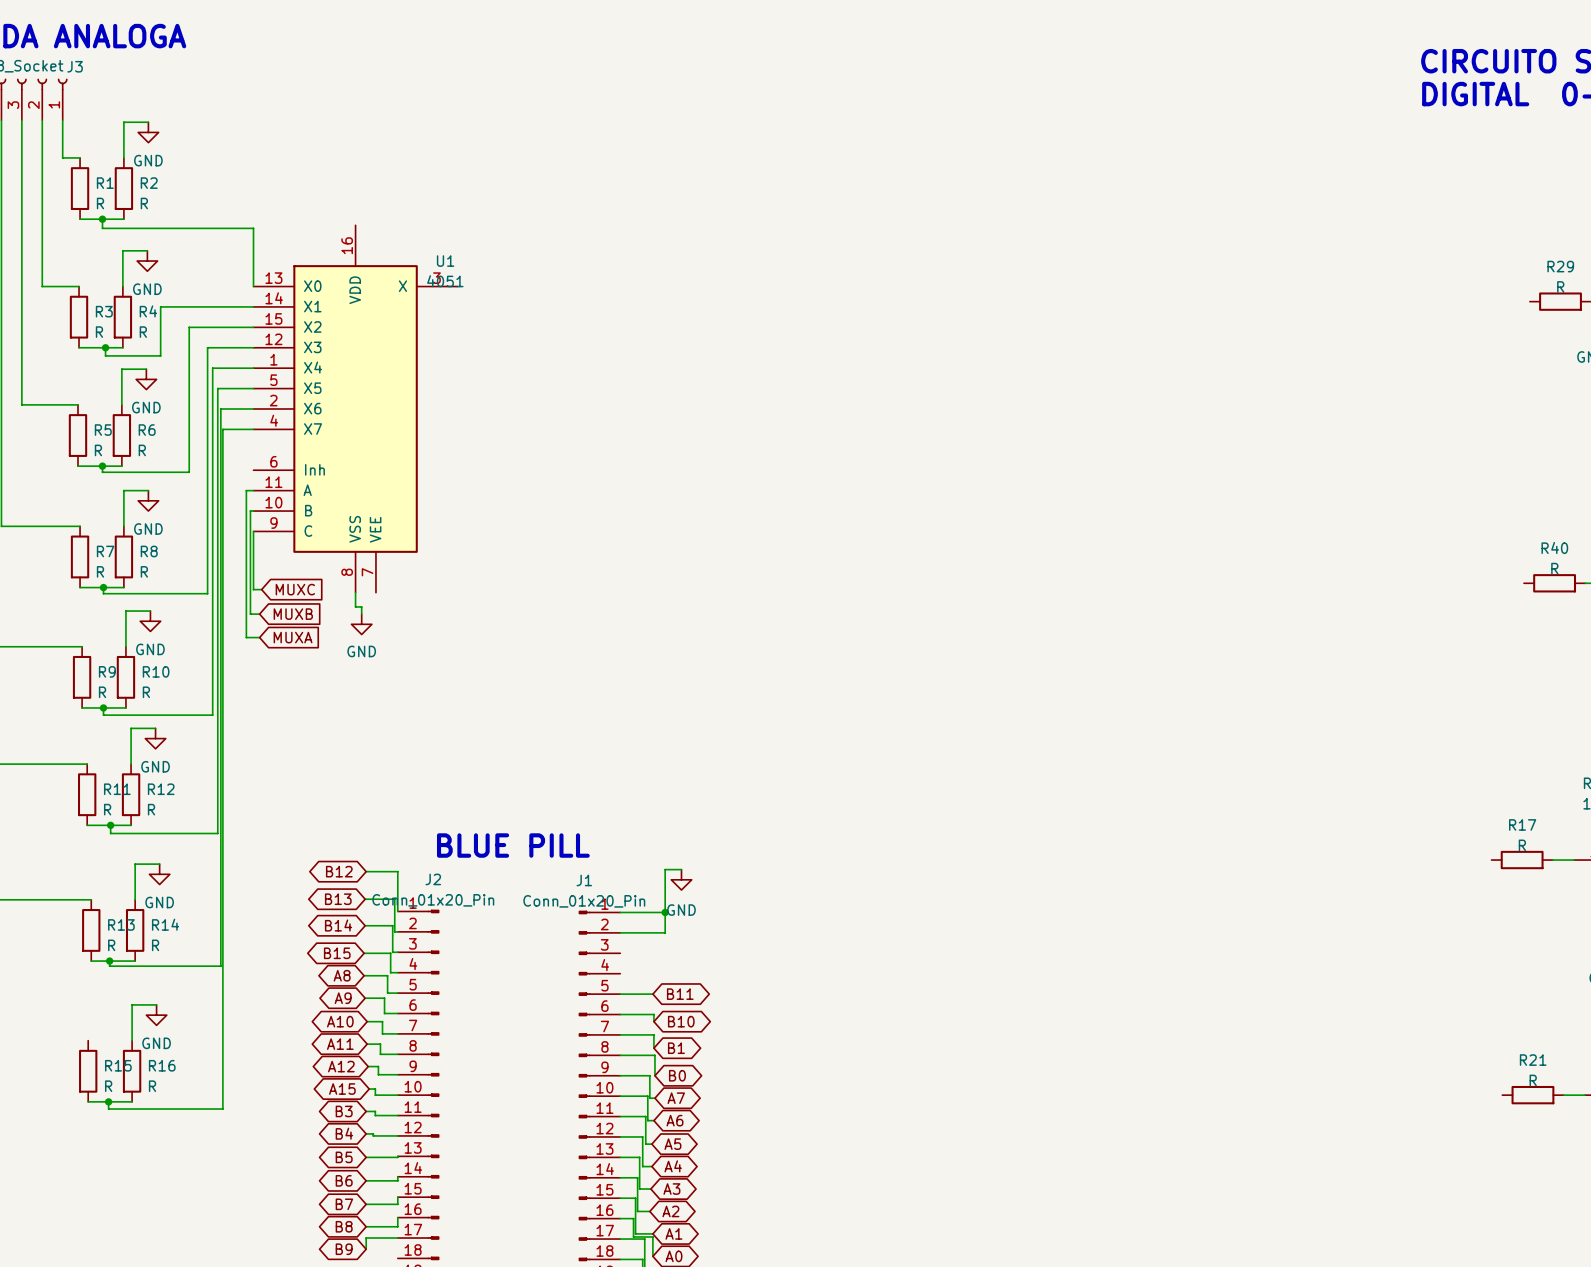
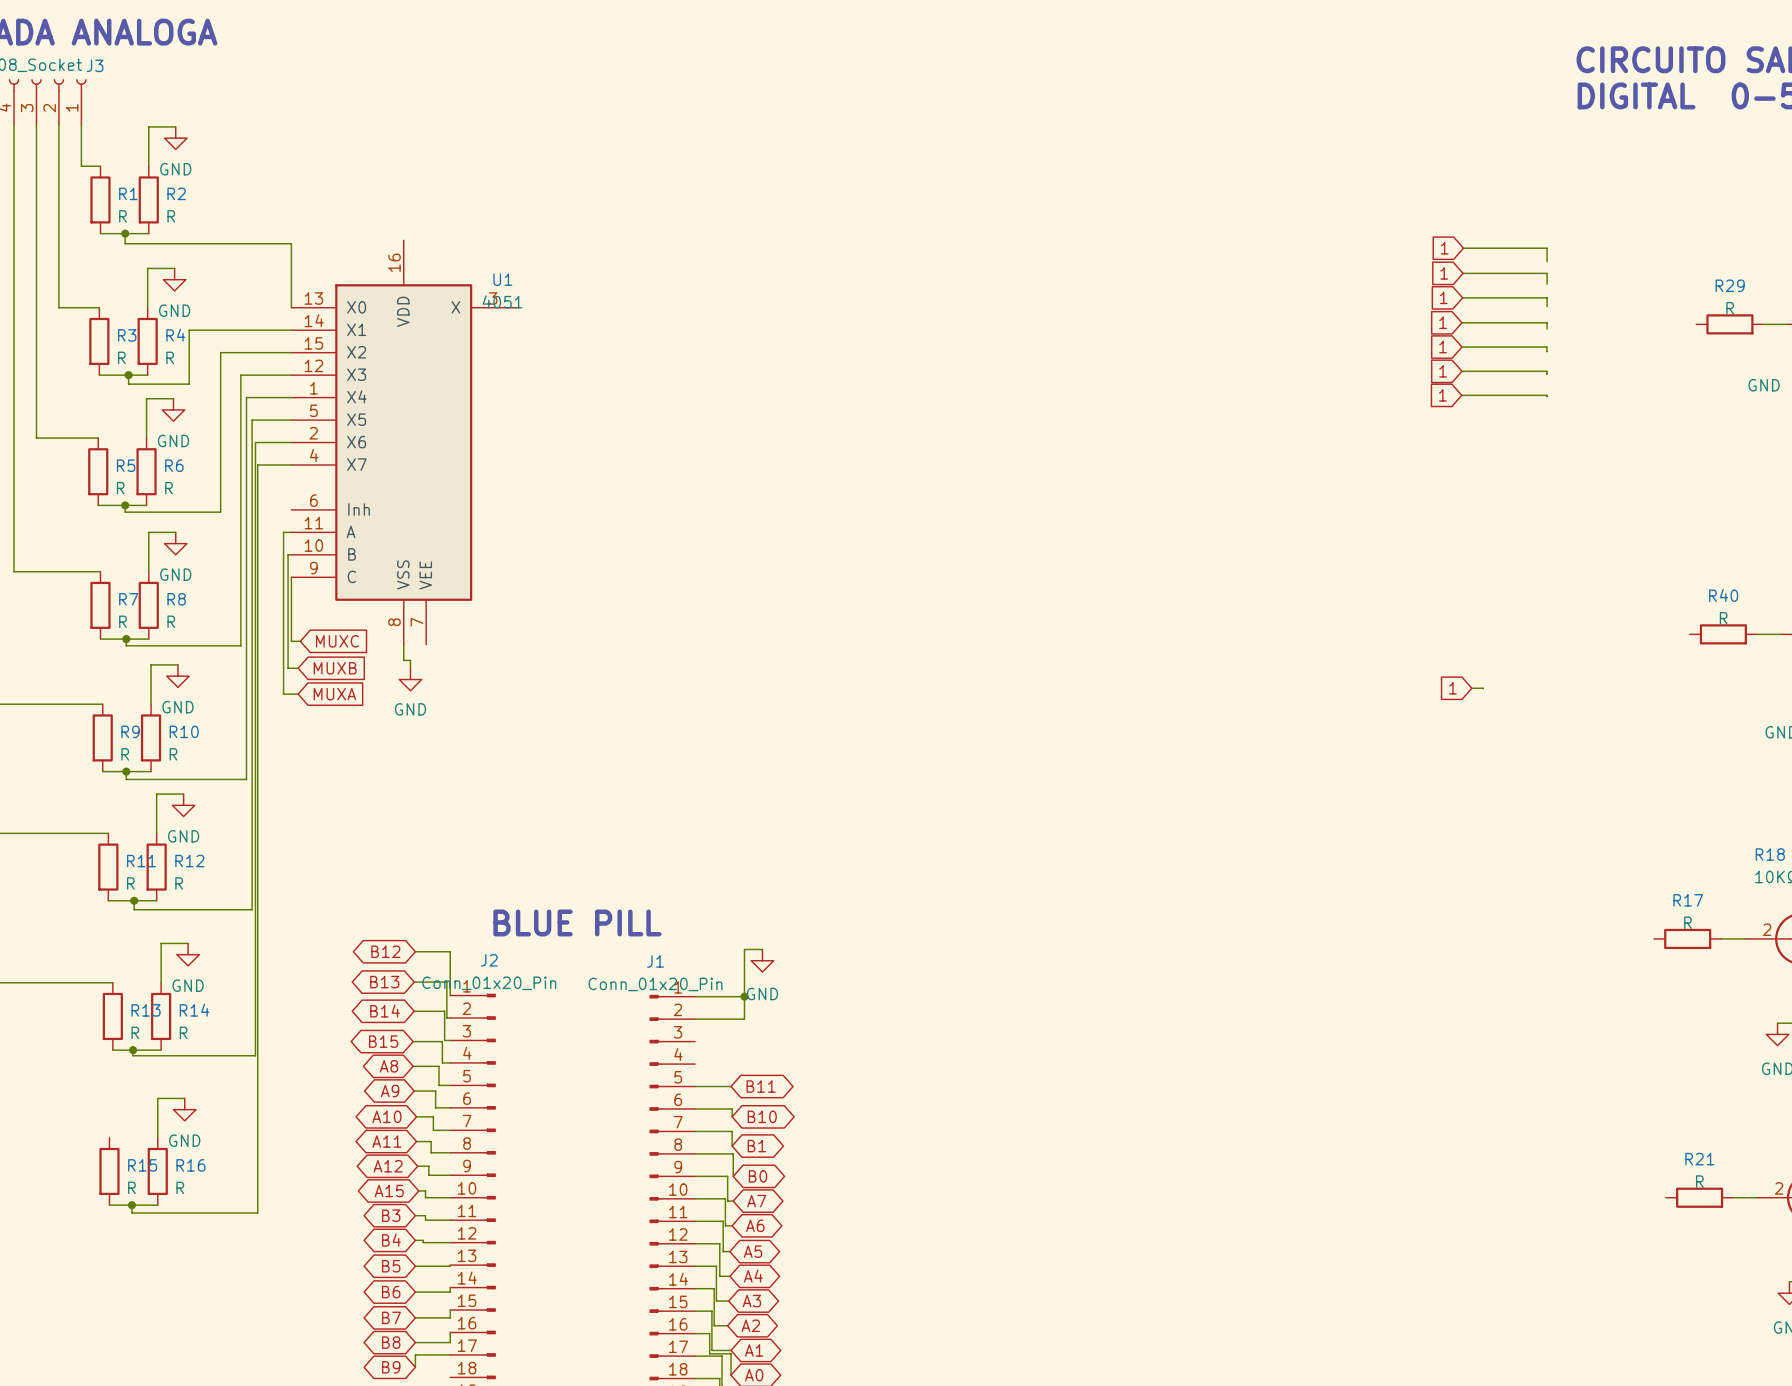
global label: none -> 1 (1444, 248)
wire: none -> (1463, 248) (1547, 248) (1547, 261)
global label: none -> 1 (1444, 273)
wire: none -> (1463, 273) (1547, 273) (1547, 284)
global label: none -> 1 (1443, 297)
wire: none -> (1462, 297) (1547, 297) (1547, 306)
global label: none -> 1 (1443, 322)
wire: none -> (1461, 322) (1547, 322) (1547, 329)
global label: none -> 1 (1443, 347)
wire: none -> (1461, 347) (1546, 347) (1547, 351)
global label: none -> 1 (1443, 371)
wire: none -> (1461, 371) (1546, 371) (1547, 374)
global label: none -> 1 (1442, 395)
wire: none -> (1461, 395) (1547, 396)
global label: none -> 1 (1452, 688)
wire: none -> (1471, 688) (1483, 688)

